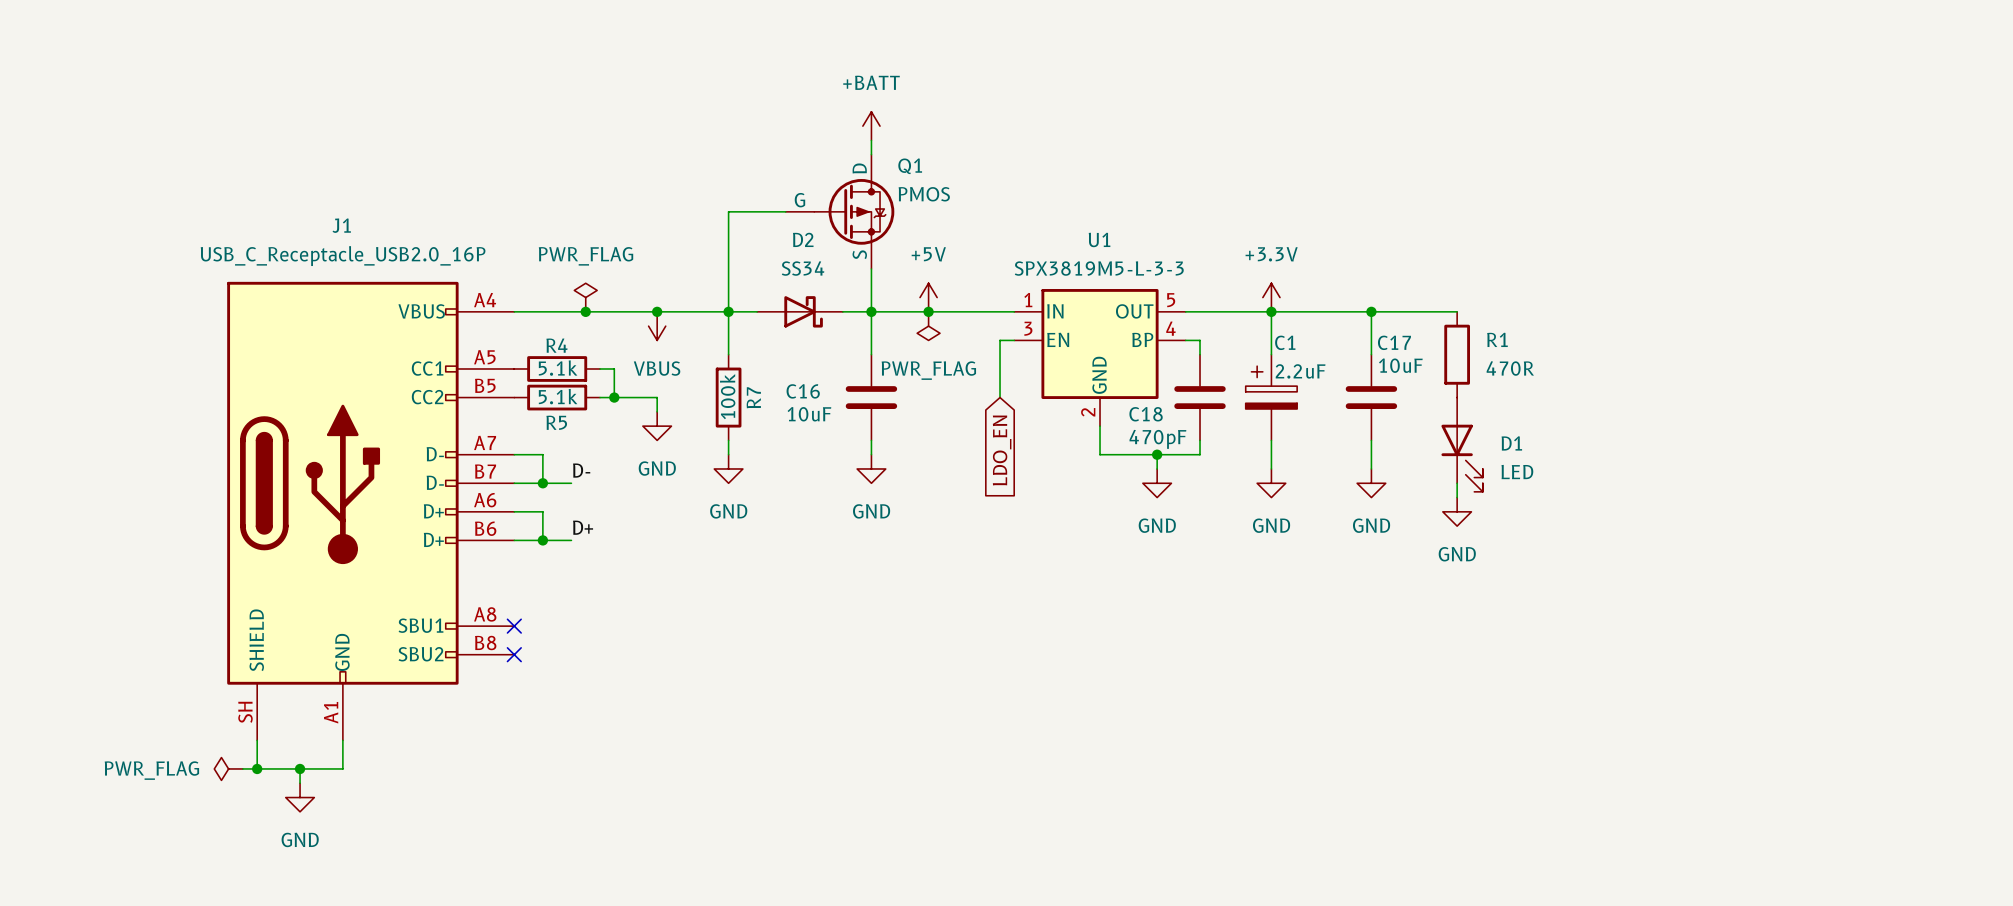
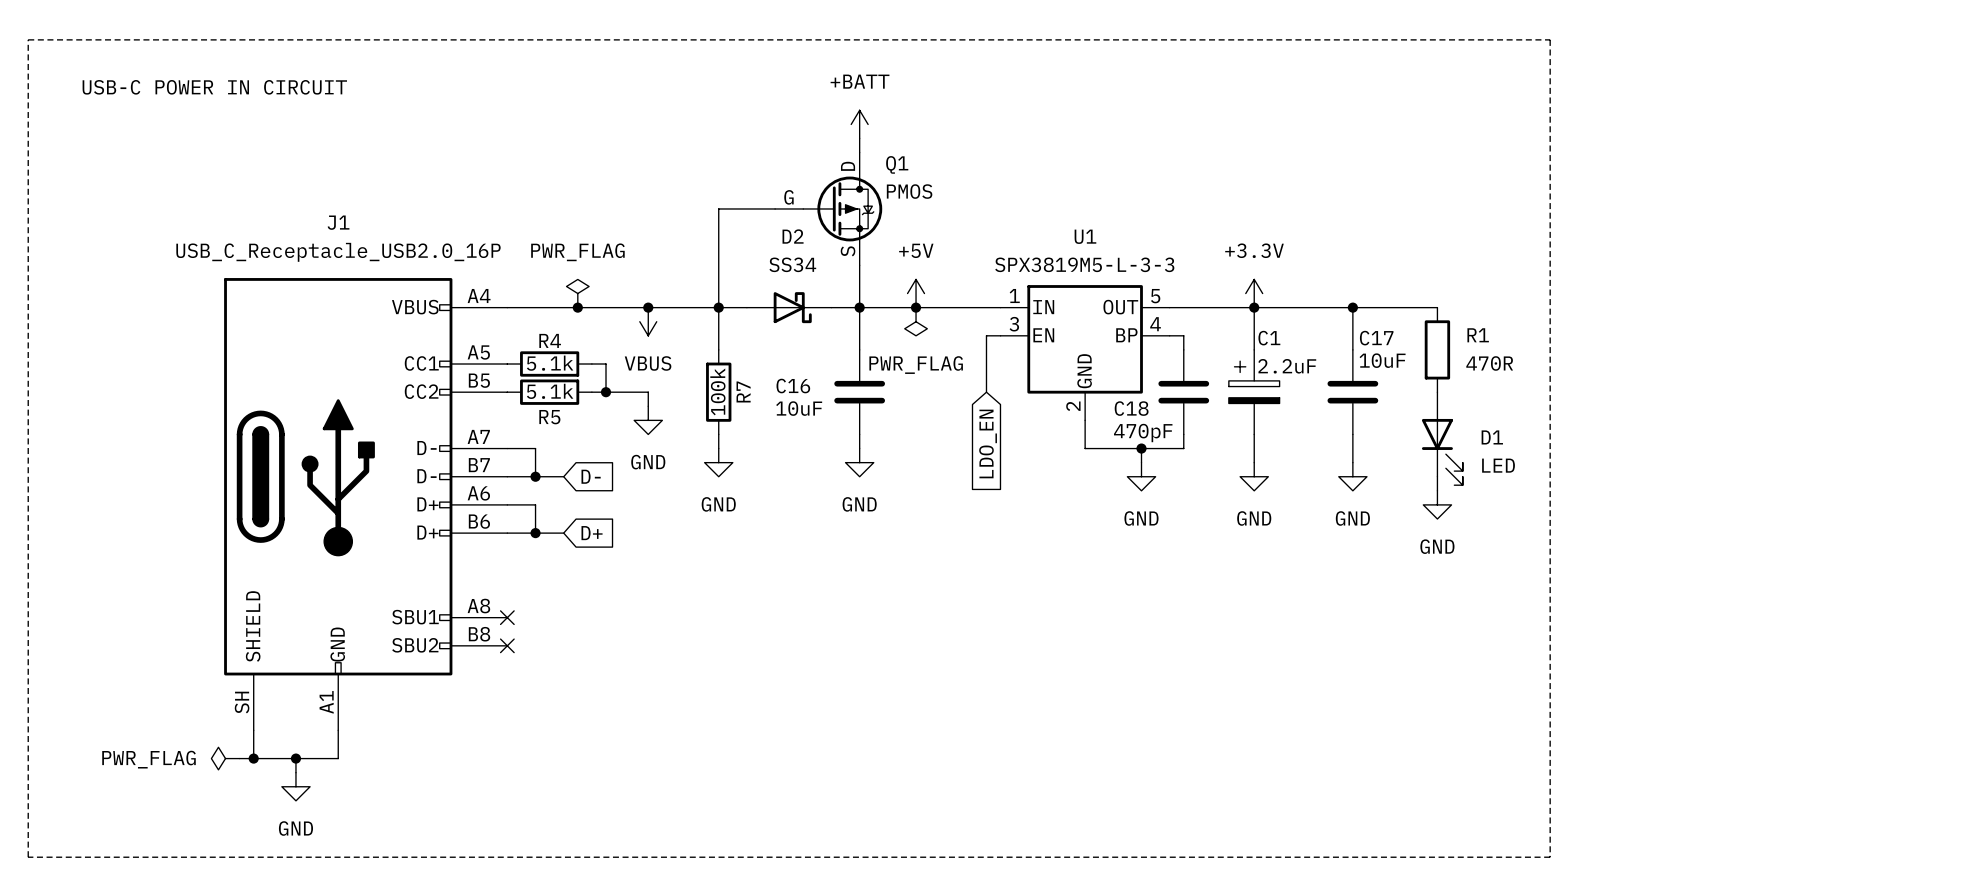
line: none -> (28, 39) (28, 857) (1550, 857) (1550, 39) (28, 39)
text: none -> USB-C POWER IN CIRCUIT (214, 87)
label: D- (581, 470) -> none
global label: none -> D- (591, 476)
label: D+ (583, 527) -> none
global label: none -> D+ (592, 533)

